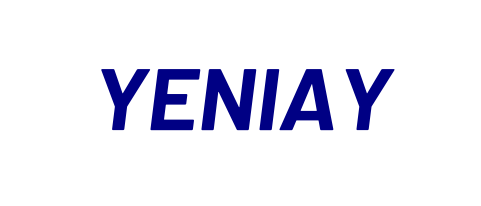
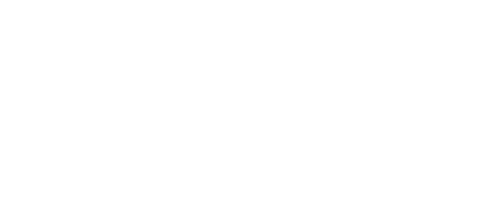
text: YENIAY (247, 99) -> none

